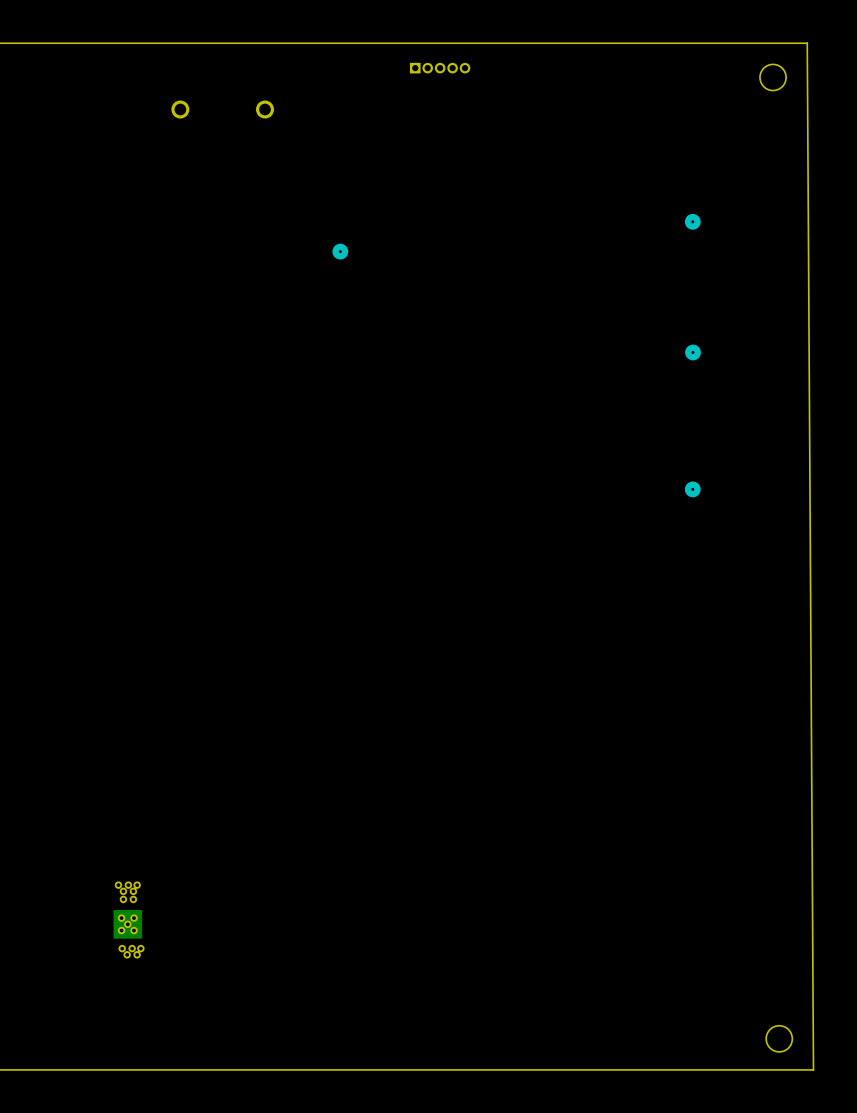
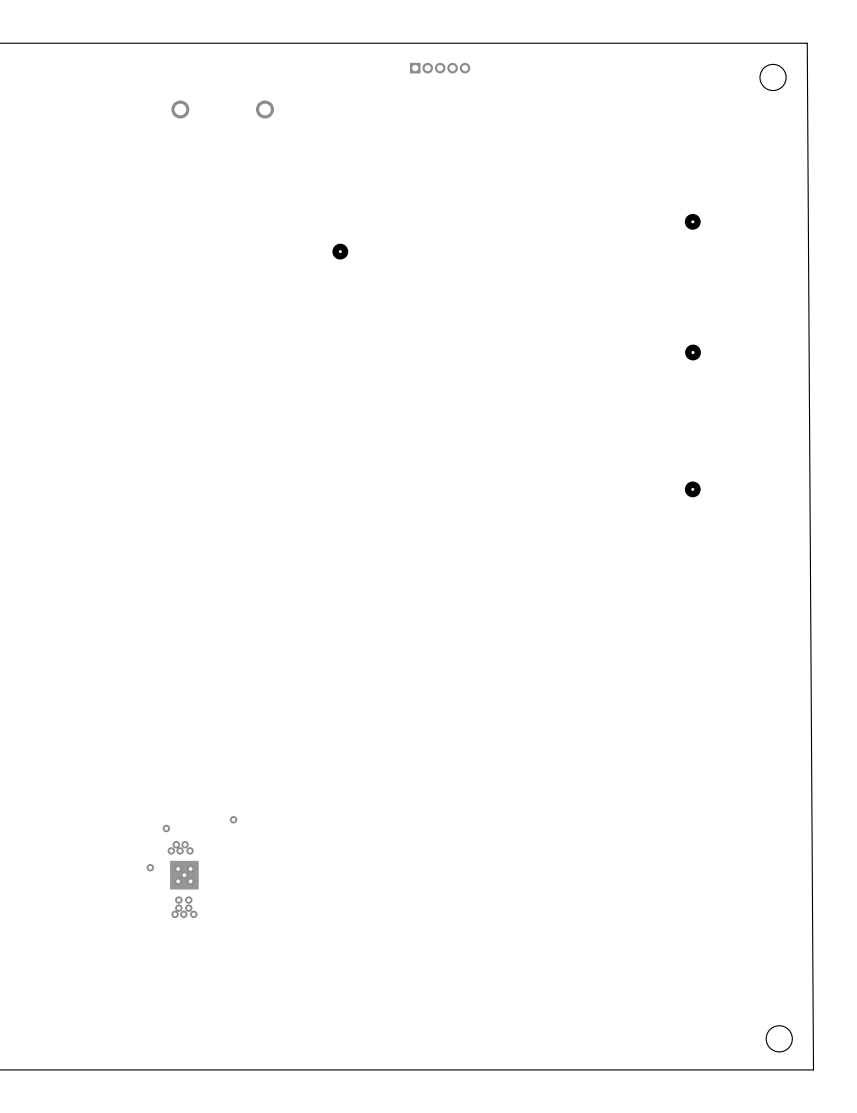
part: none -> (233, 819)
part: none -> (166, 828)
part: none -> (176, 844)
part: none -> (185, 844)
part: none -> (171, 850)
part: none -> (180, 850)
part: none -> (190, 850)
part: none -> (150, 867)
part: (118, 885) -> none
part: (128, 885) -> none
part: (137, 885) -> none
part: (123, 891) -> none
part: (133, 891) -> none
part: (123, 899) -> none
part: (133, 899) -> none
part: none -> (178, 900)
part: none -> (188, 900)
part: none -> (178, 908)
part: none -> (188, 908)
part: none -> (175, 914)
part: none -> (183, 914)
part: none -> (193, 914)
part position: (127, 924) -> (184, 875)
part: (122, 948) -> none
part: (132, 948) -> none
part: (140, 948) -> none
part: (127, 954) -> none
part: (137, 954) -> none

